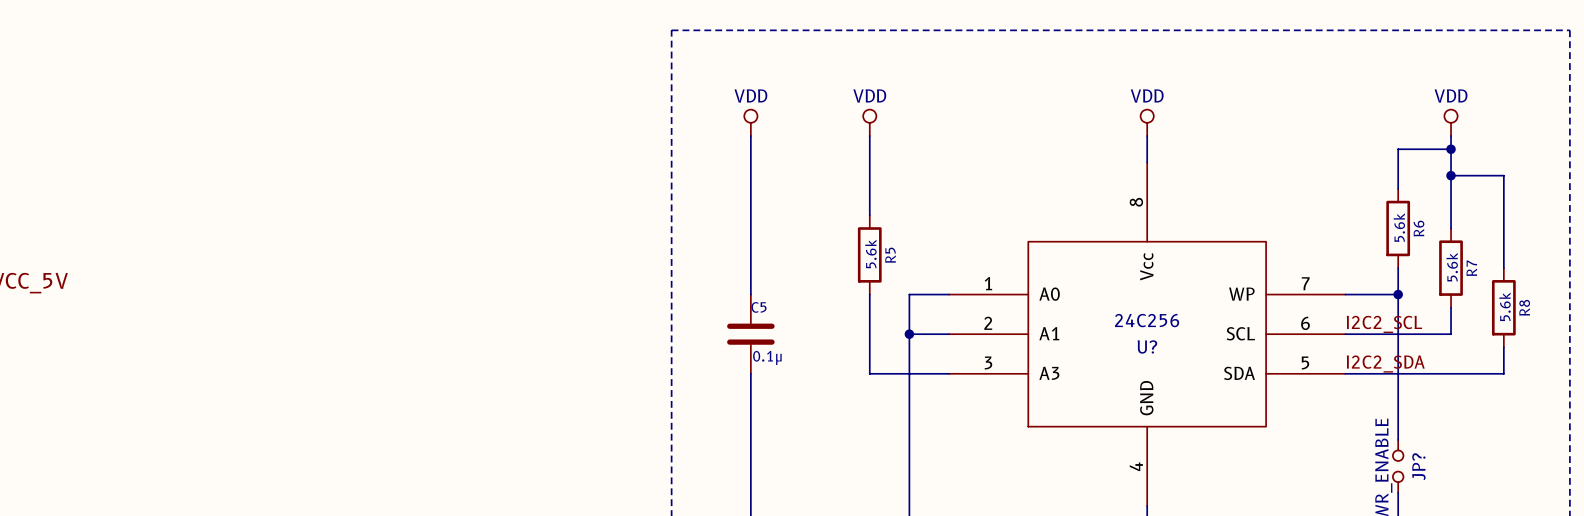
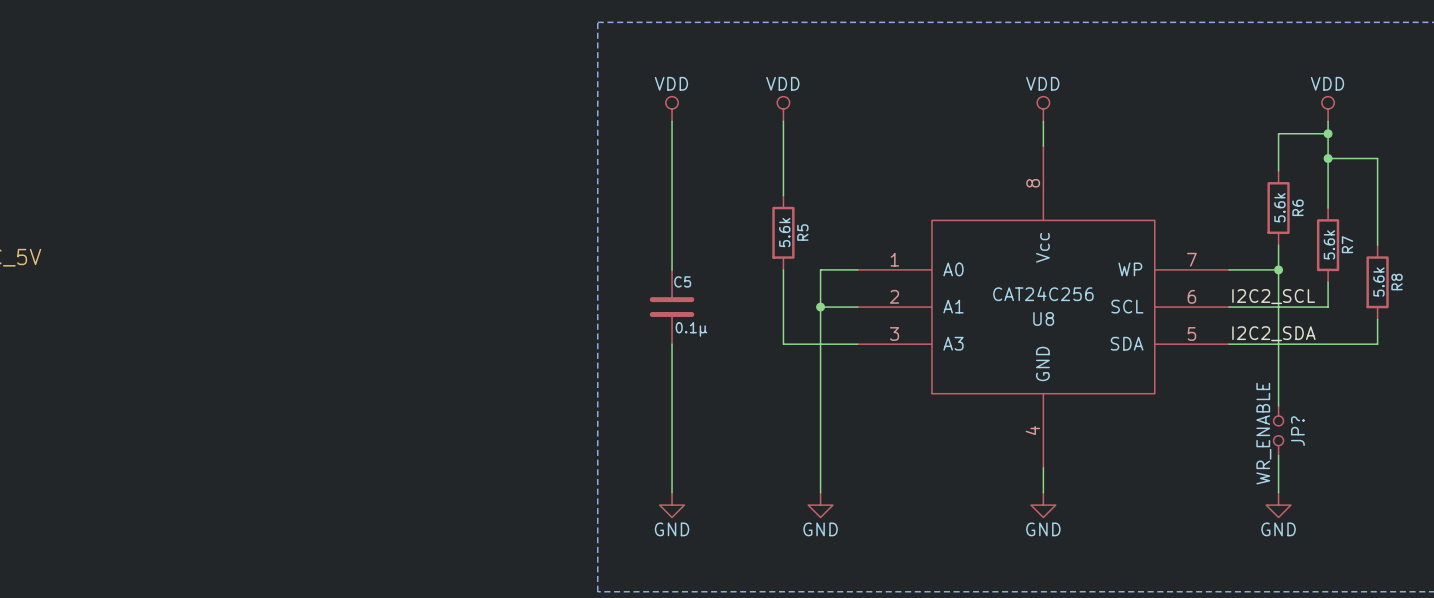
U? value: 24C256 (1147, 320) -> CAT24C256 (1043, 293)
U? name: U? (1147, 346) -> U8 (1043, 318)

